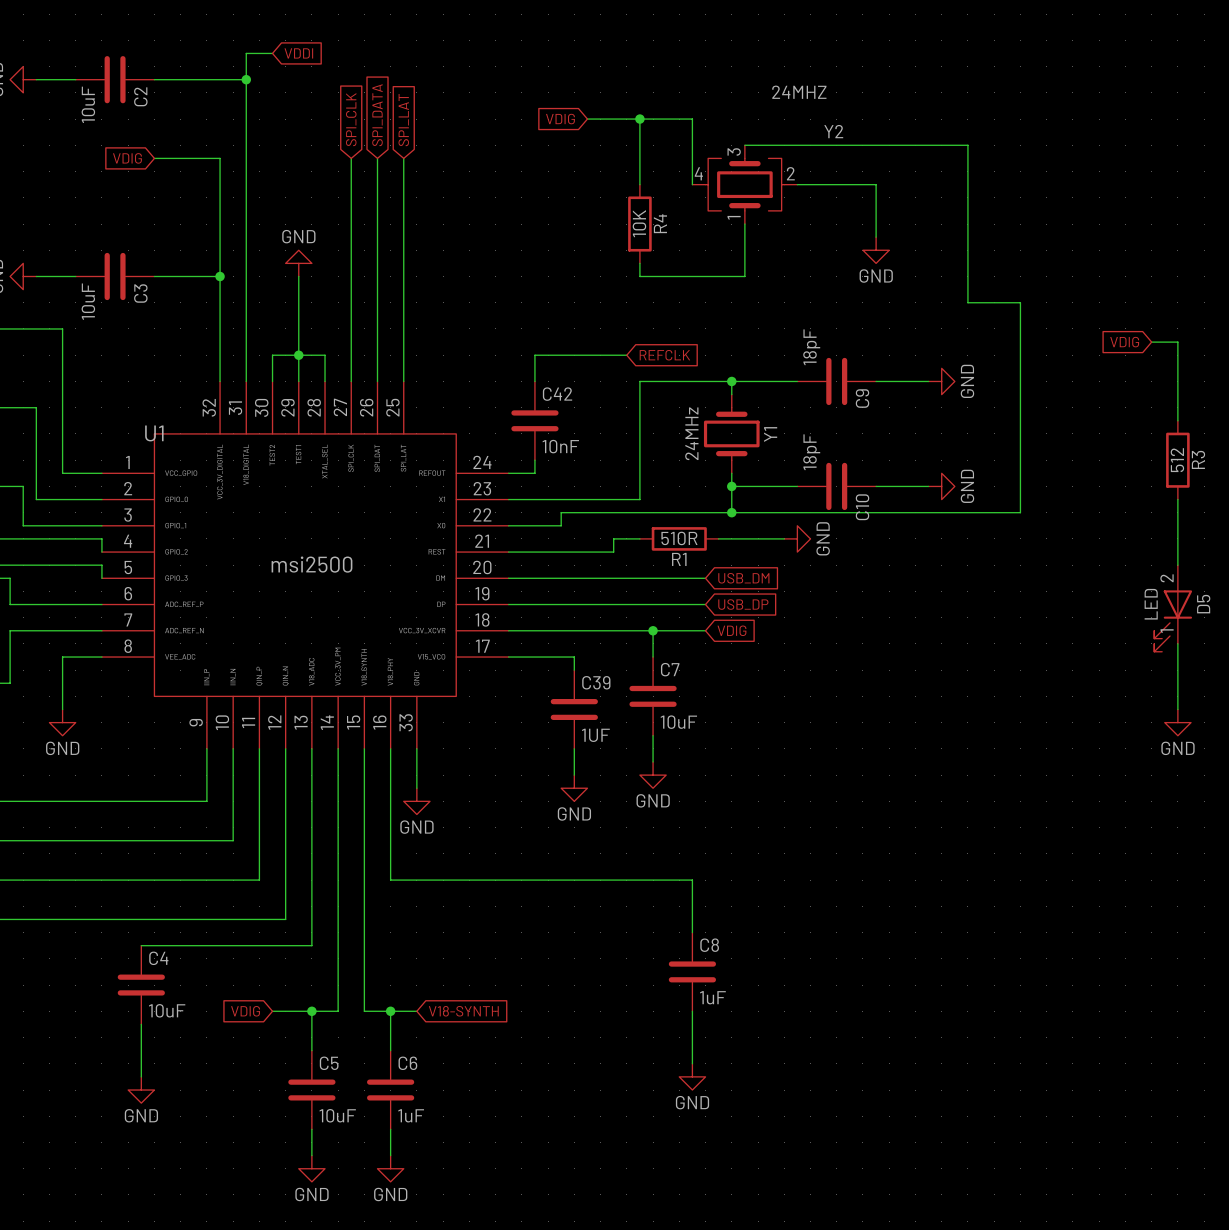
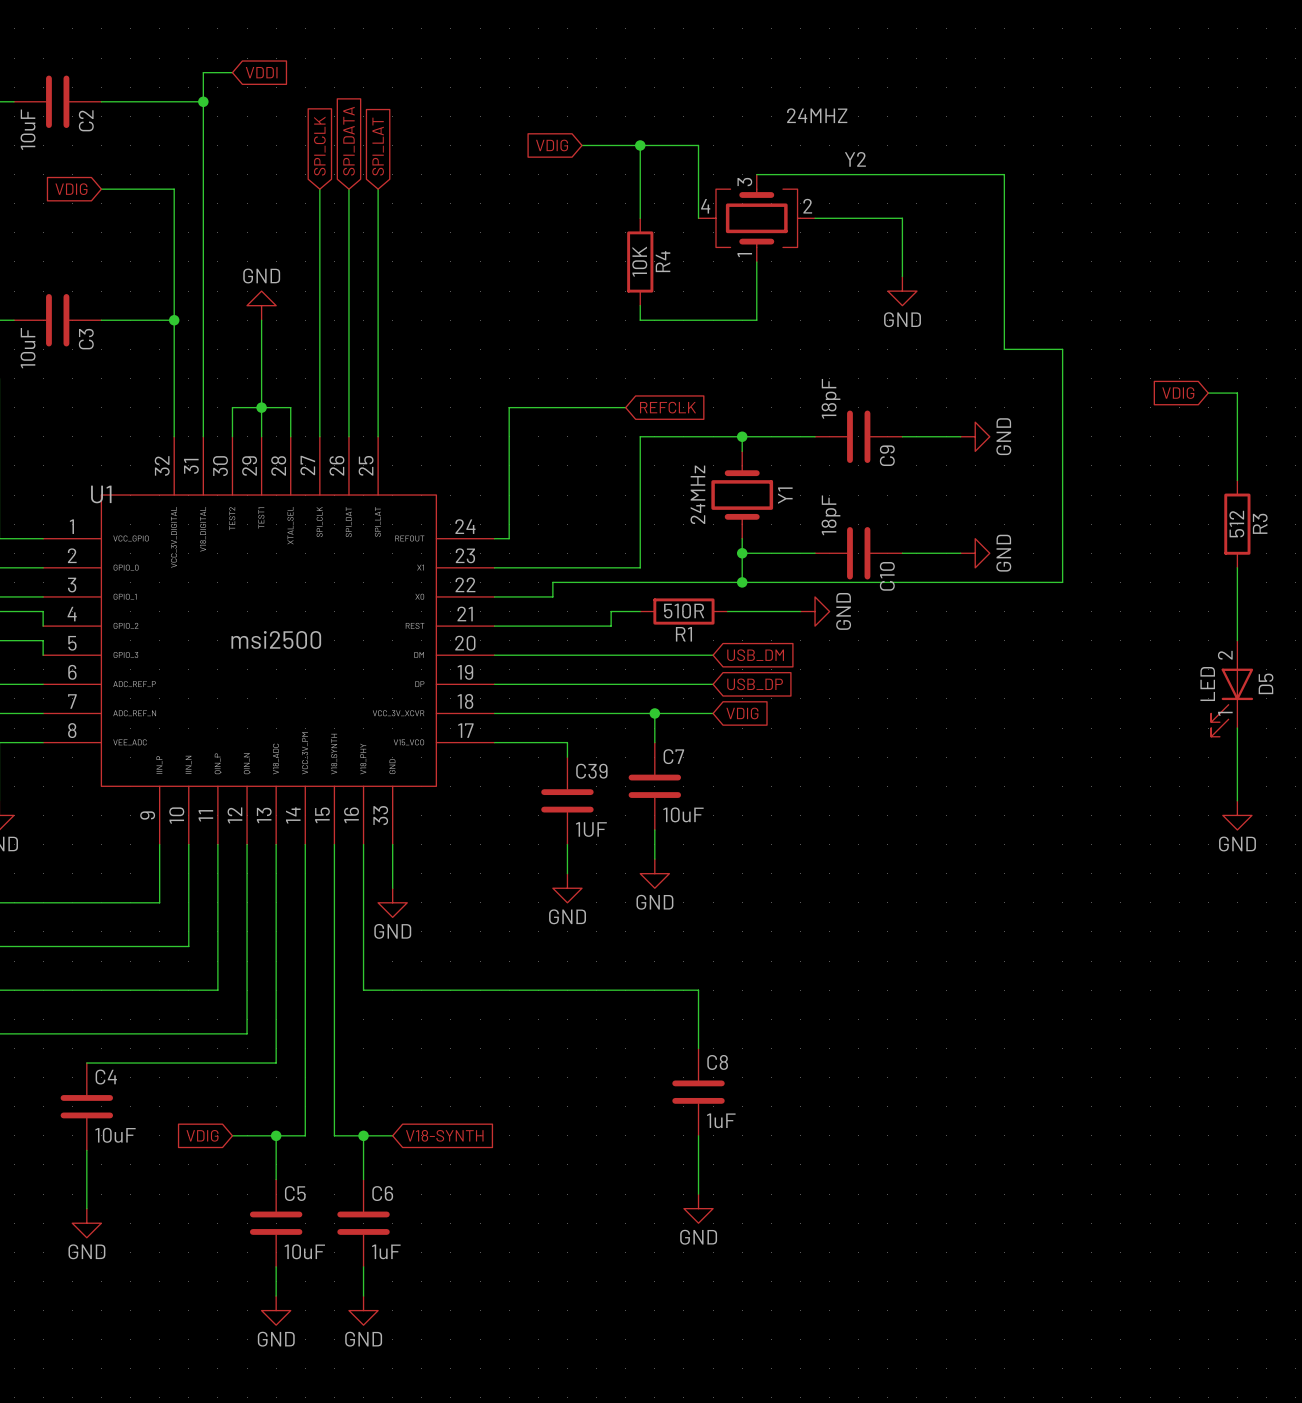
wire: (534, 355) (534, 381) -> (523, 407) (509, 407) (509, 538)
C42: 10nF (534, 420) -> none
wire: (534, 460) (534, 473) (521, 473) -> none

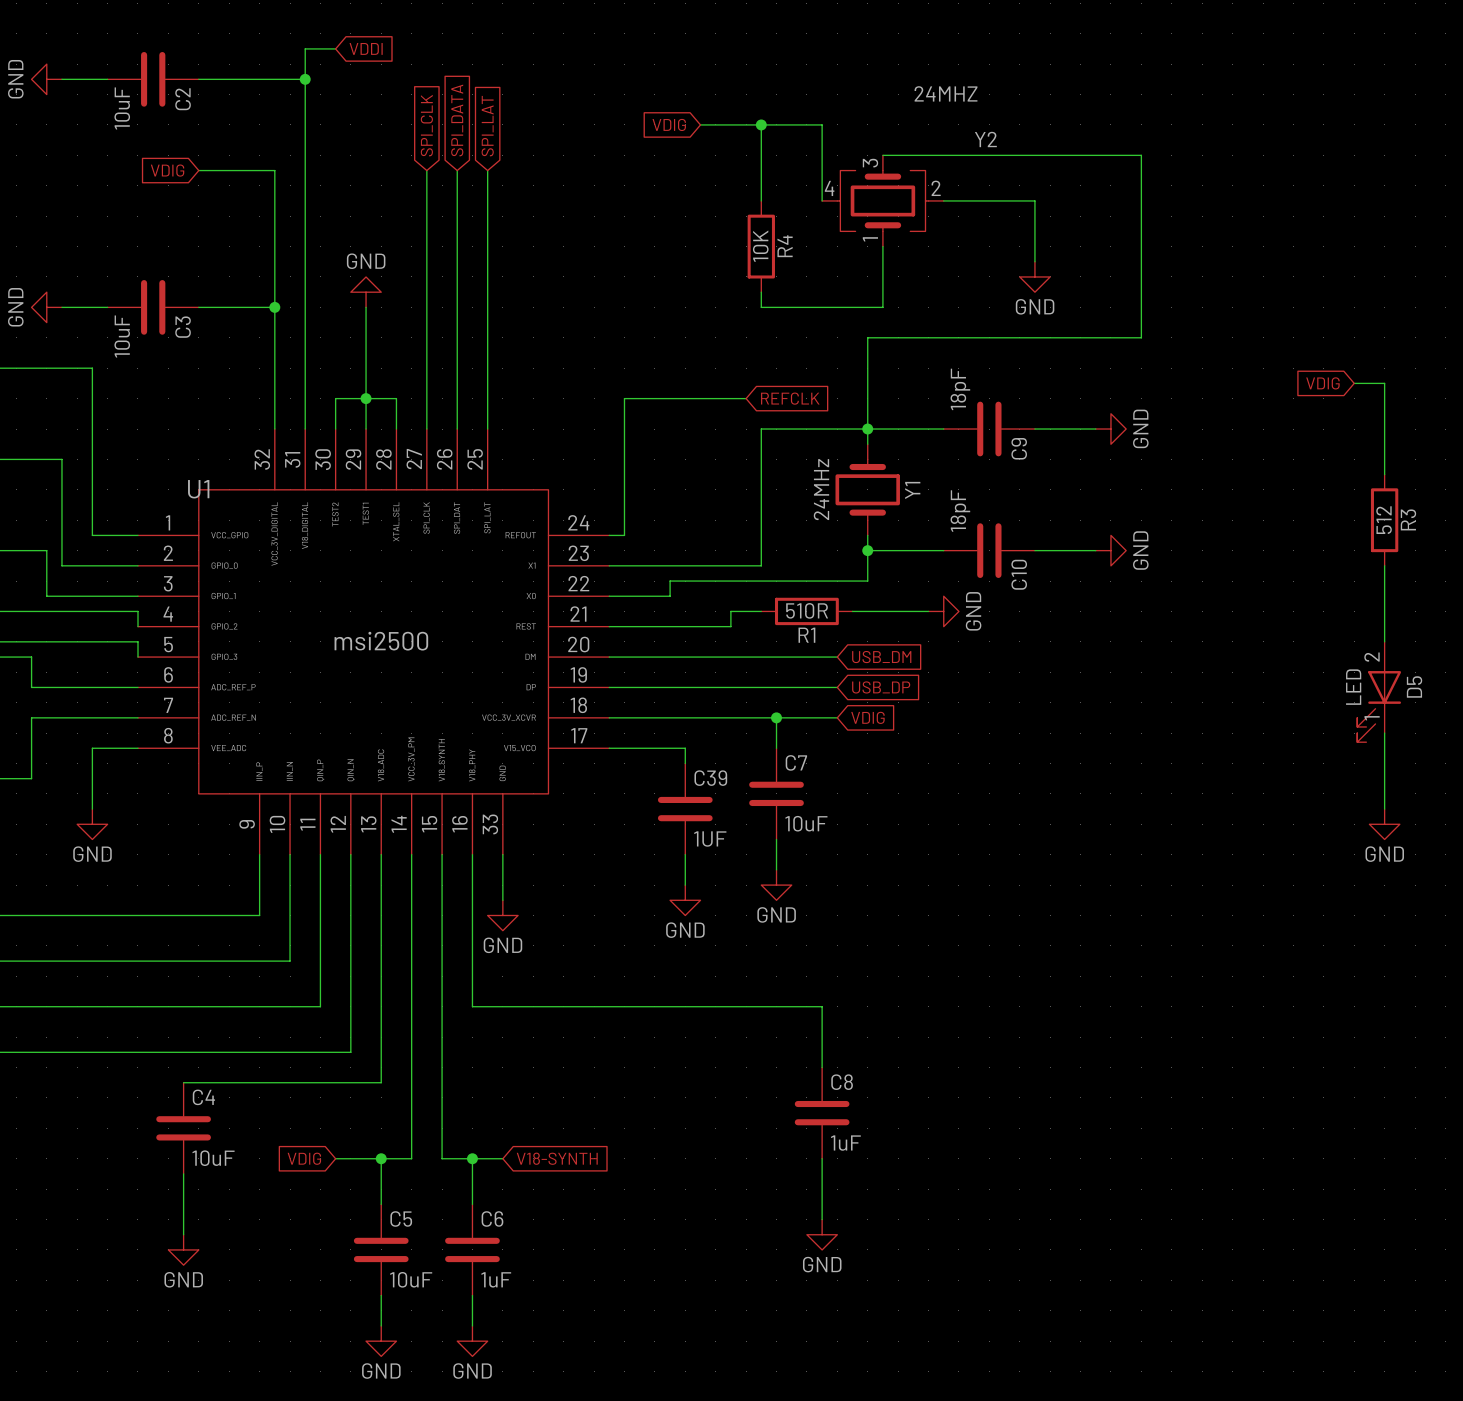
wire: (1004, 349) (1062, 349) (1062, 582) (742, 582) -> (1141, 337) (867, 337) (867, 429)
junction: (742, 582) -> none

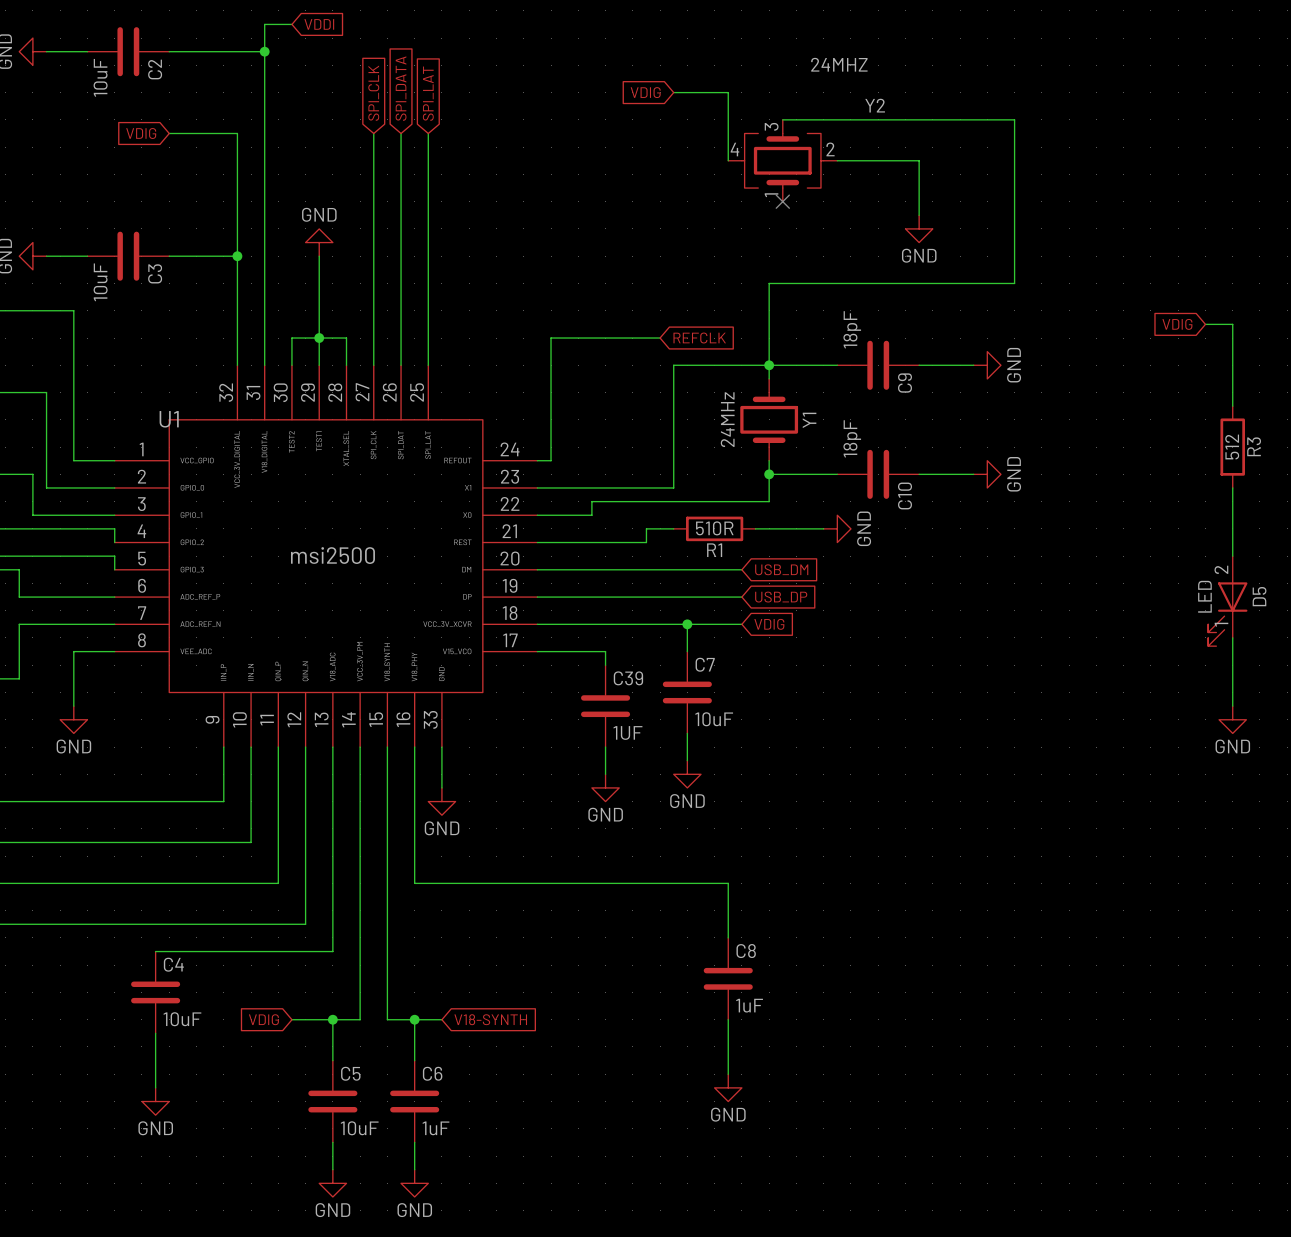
global label position: VDIG (669, 124) -> VDIG (645, 92)
wire: (700, 124) (761, 124) (761, 200) -> none
junction: (761, 124) -> none
R4: 10K (761, 246) -> none
wire: (882, 246) (882, 307) (761, 307) (761, 292) -> none
no-connect mark: none -> (782, 201)

